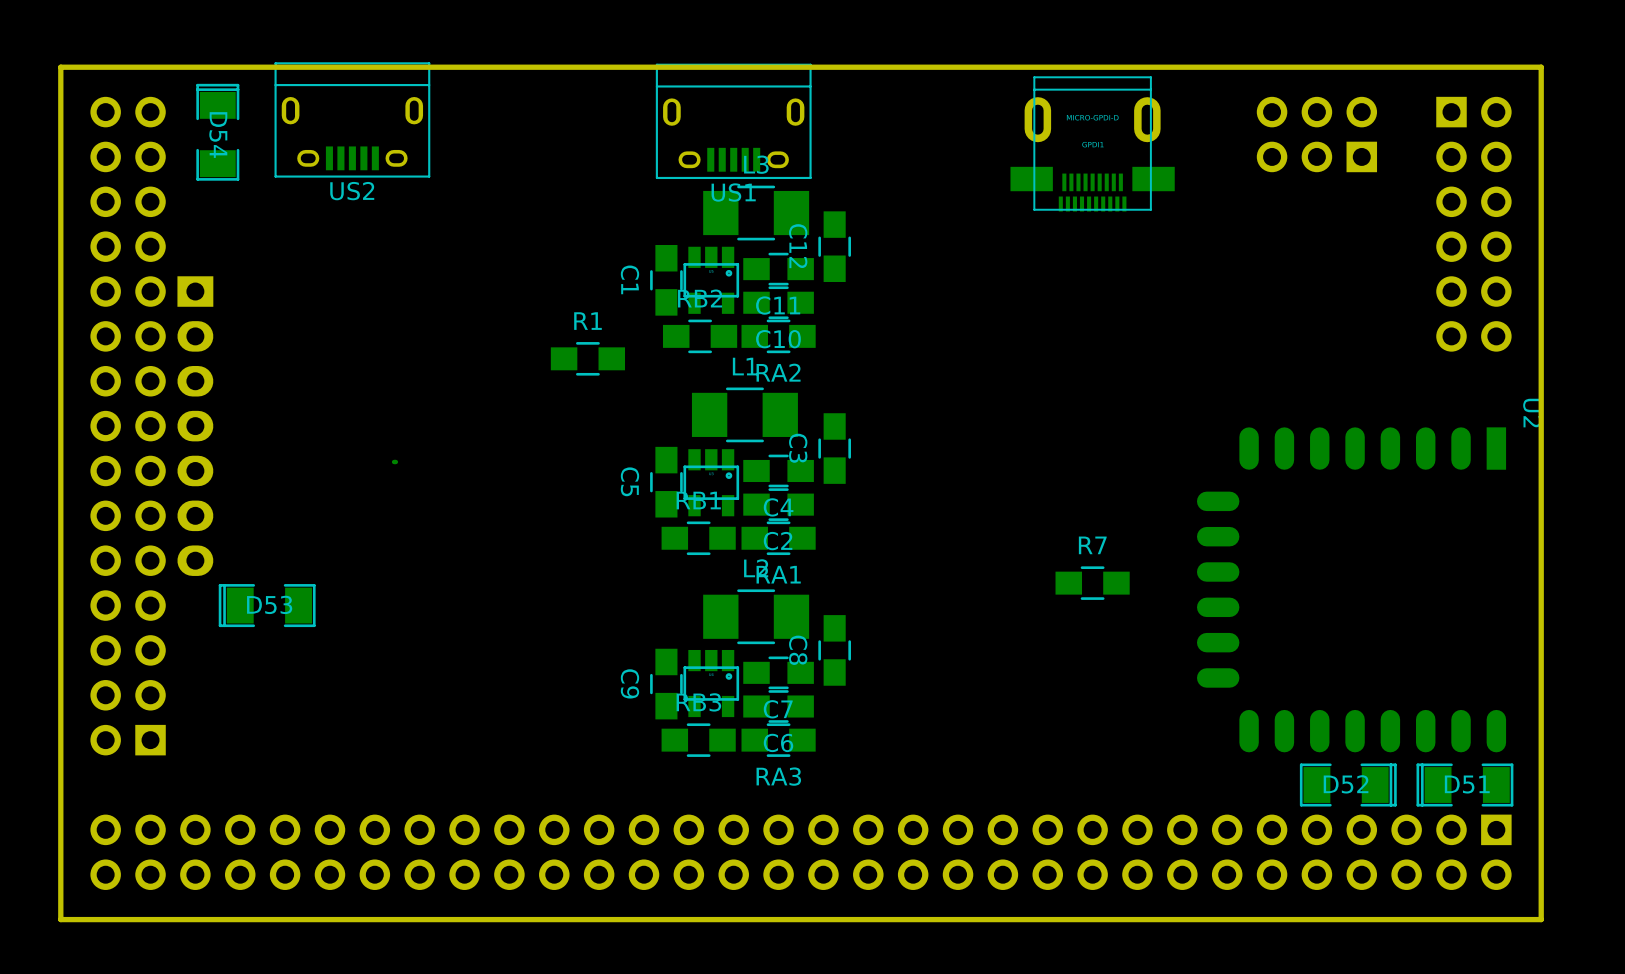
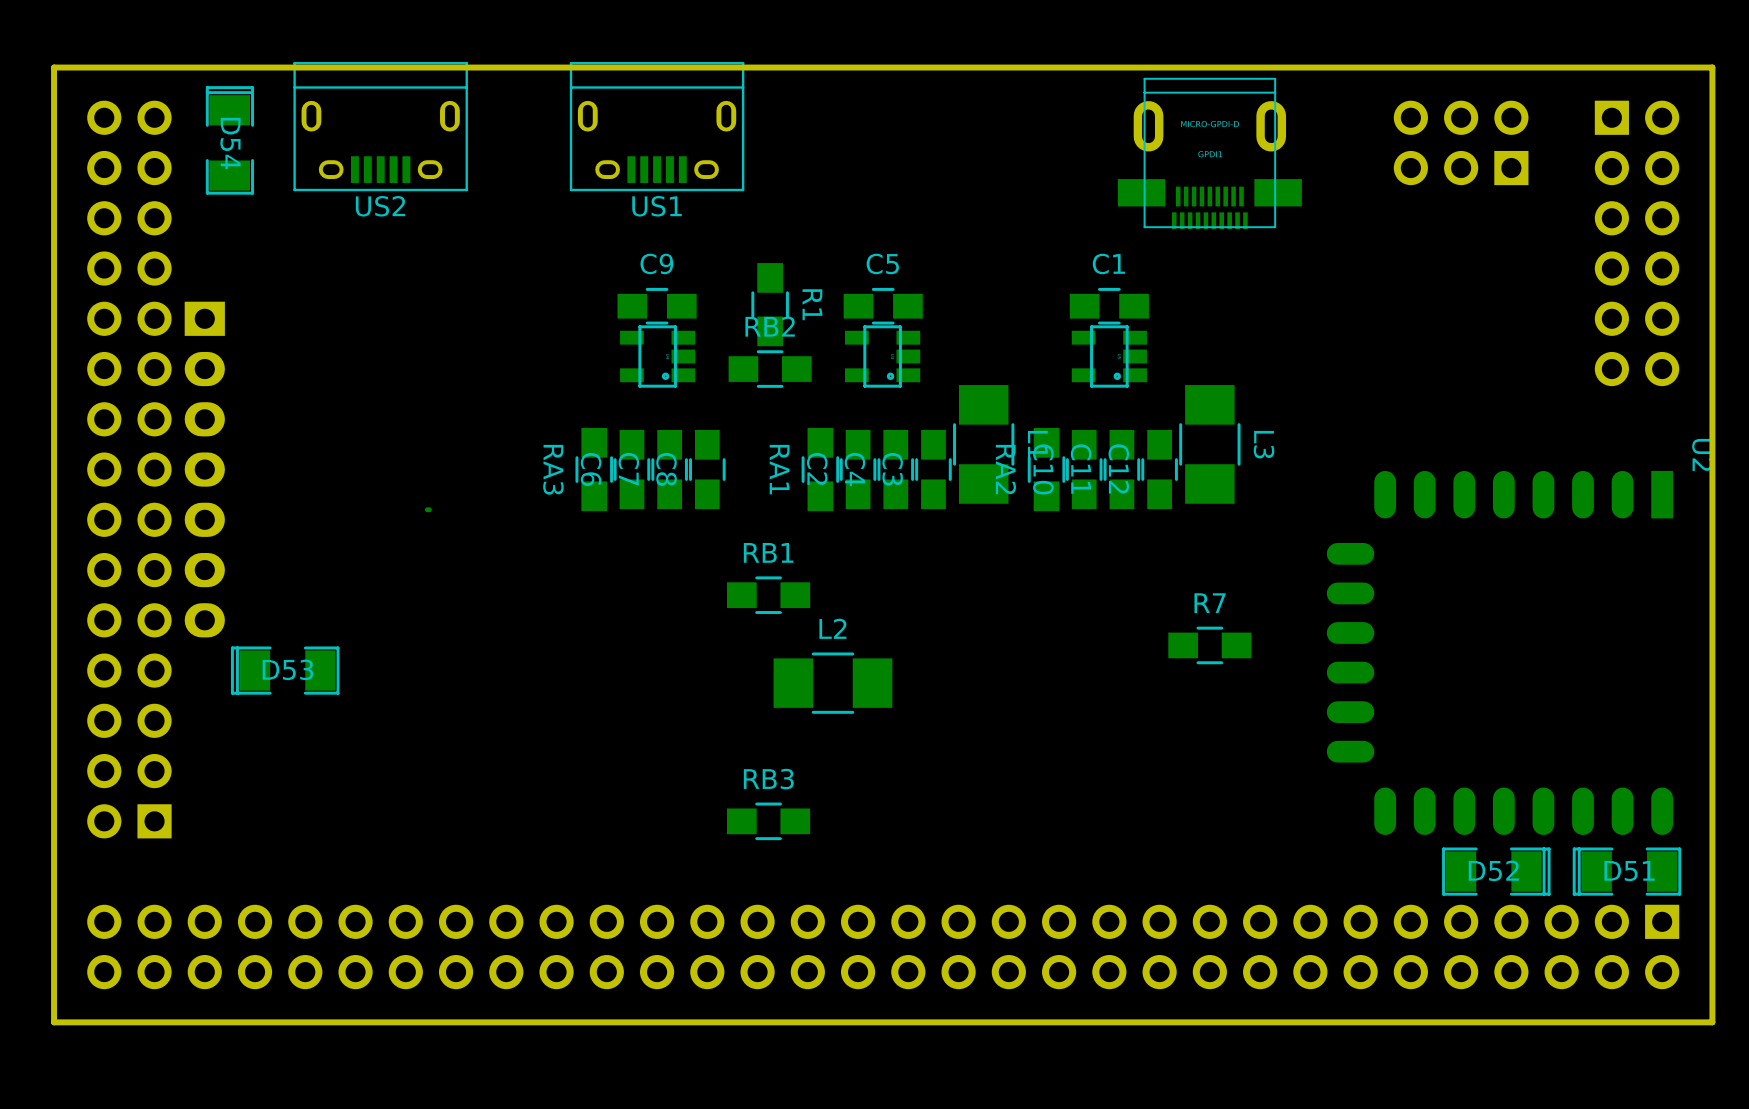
US1 position: (733, 121) -> (657, 126)
L3 rotation: 0° (756, 213) -> 90° clockwise (1209, 444)
L3 position: (756, 213) -> (1209, 444)
C12 position: (834, 246) -> (1159, 469)
C11 rotation: 0° (778, 269) -> 90° clockwise (1121, 469)
C11 position: (778, 269) -> (1121, 469)
C1 rotation: 0° (666, 280) -> 90° clockwise (1109, 306)
C1 position: (666, 280) -> (1109, 306)
part rotation: 0° (711, 280) -> 90° clockwise (1109, 356)
part position: (711, 280) -> (1109, 356)
C10 rotation: 0° (778, 302) -> 90° clockwise (1084, 469)
C10 position: (778, 302) -> (1084, 469)
RA2 rotation: 0° (778, 336) -> 90° clockwise (1046, 469)
RA2 position: (778, 336) -> (1046, 469)
R1 rotation: 0° (587, 358) -> 90° clockwise (770, 304)
R1 position: (587, 358) -> (770, 304)
L1 rotation: 0° (744, 414) -> 90° clockwise (983, 444)
L1 position: (744, 414) -> (983, 444)
C3 position: (834, 448) -> (933, 469)
C4 rotation: 0° (778, 470) -> 90° clockwise (895, 469)
C4 position: (778, 470) -> (895, 469)
C5 rotation: 0° (666, 482) -> 90° clockwise (883, 306)
C5 position: (666, 482) -> (883, 306)
part rotation: 0° (711, 482) -> 90° clockwise (882, 356)
part position: (711, 482) -> (882, 356)
C2 rotation: 0° (778, 504) -> 90° clockwise (858, 469)
C2 position: (778, 504) -> (858, 469)
RA1 rotation: 0° (778, 538) -> 90° clockwise (820, 469)
RA1 position: (778, 538) -> (820, 469)
C8 position: (834, 650) -> (707, 469)
C7 rotation: 0° (778, 672) -> 90° clockwise (669, 469)
C7 position: (778, 672) -> (669, 469)
part rotation: 0° (711, 683) -> 90° clockwise (657, 356)
part position: (711, 683) -> (657, 356)
C9 rotation: 0° (666, 684) -> 90° clockwise (657, 306)
C9 position: (666, 684) -> (657, 306)
C6 rotation: 0° (778, 706) -> 90° clockwise (631, 469)
C6 position: (778, 706) -> (631, 469)
RA3 rotation: 0° (778, 740) -> 90° clockwise (594, 469)
RA3 position: (778, 740) -> (594, 469)

